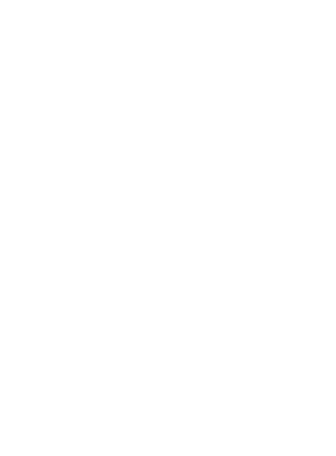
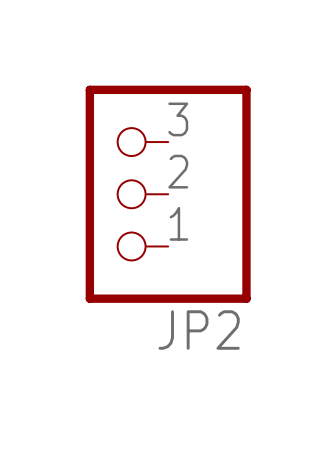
JP2: none -> (168, 194)

